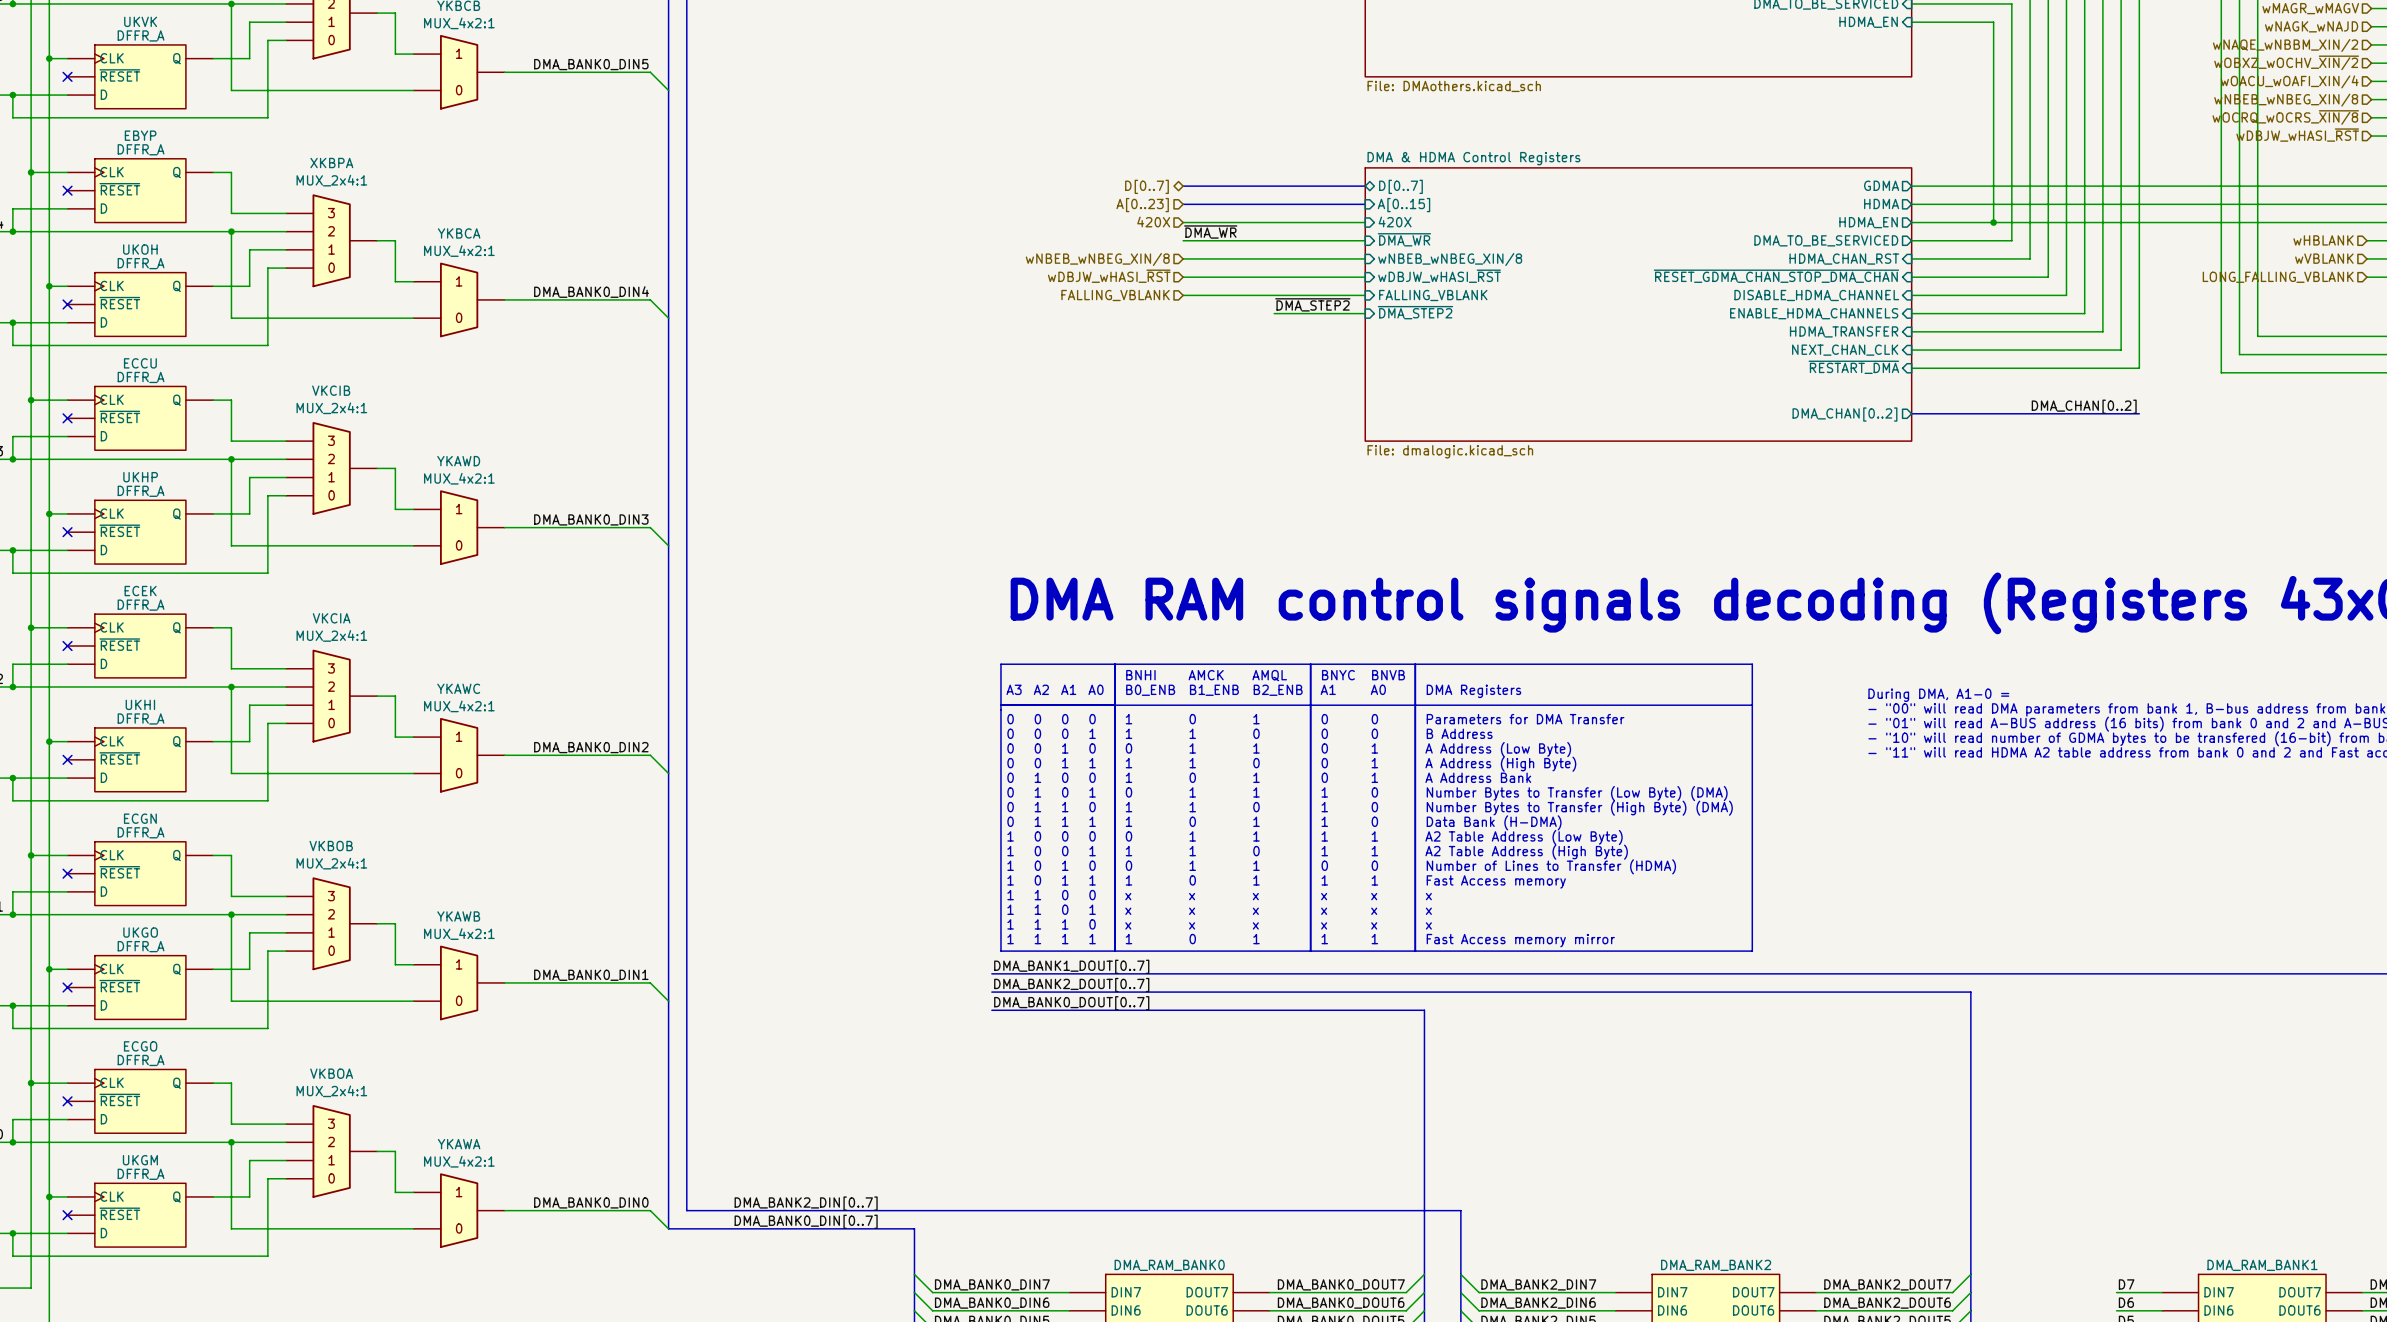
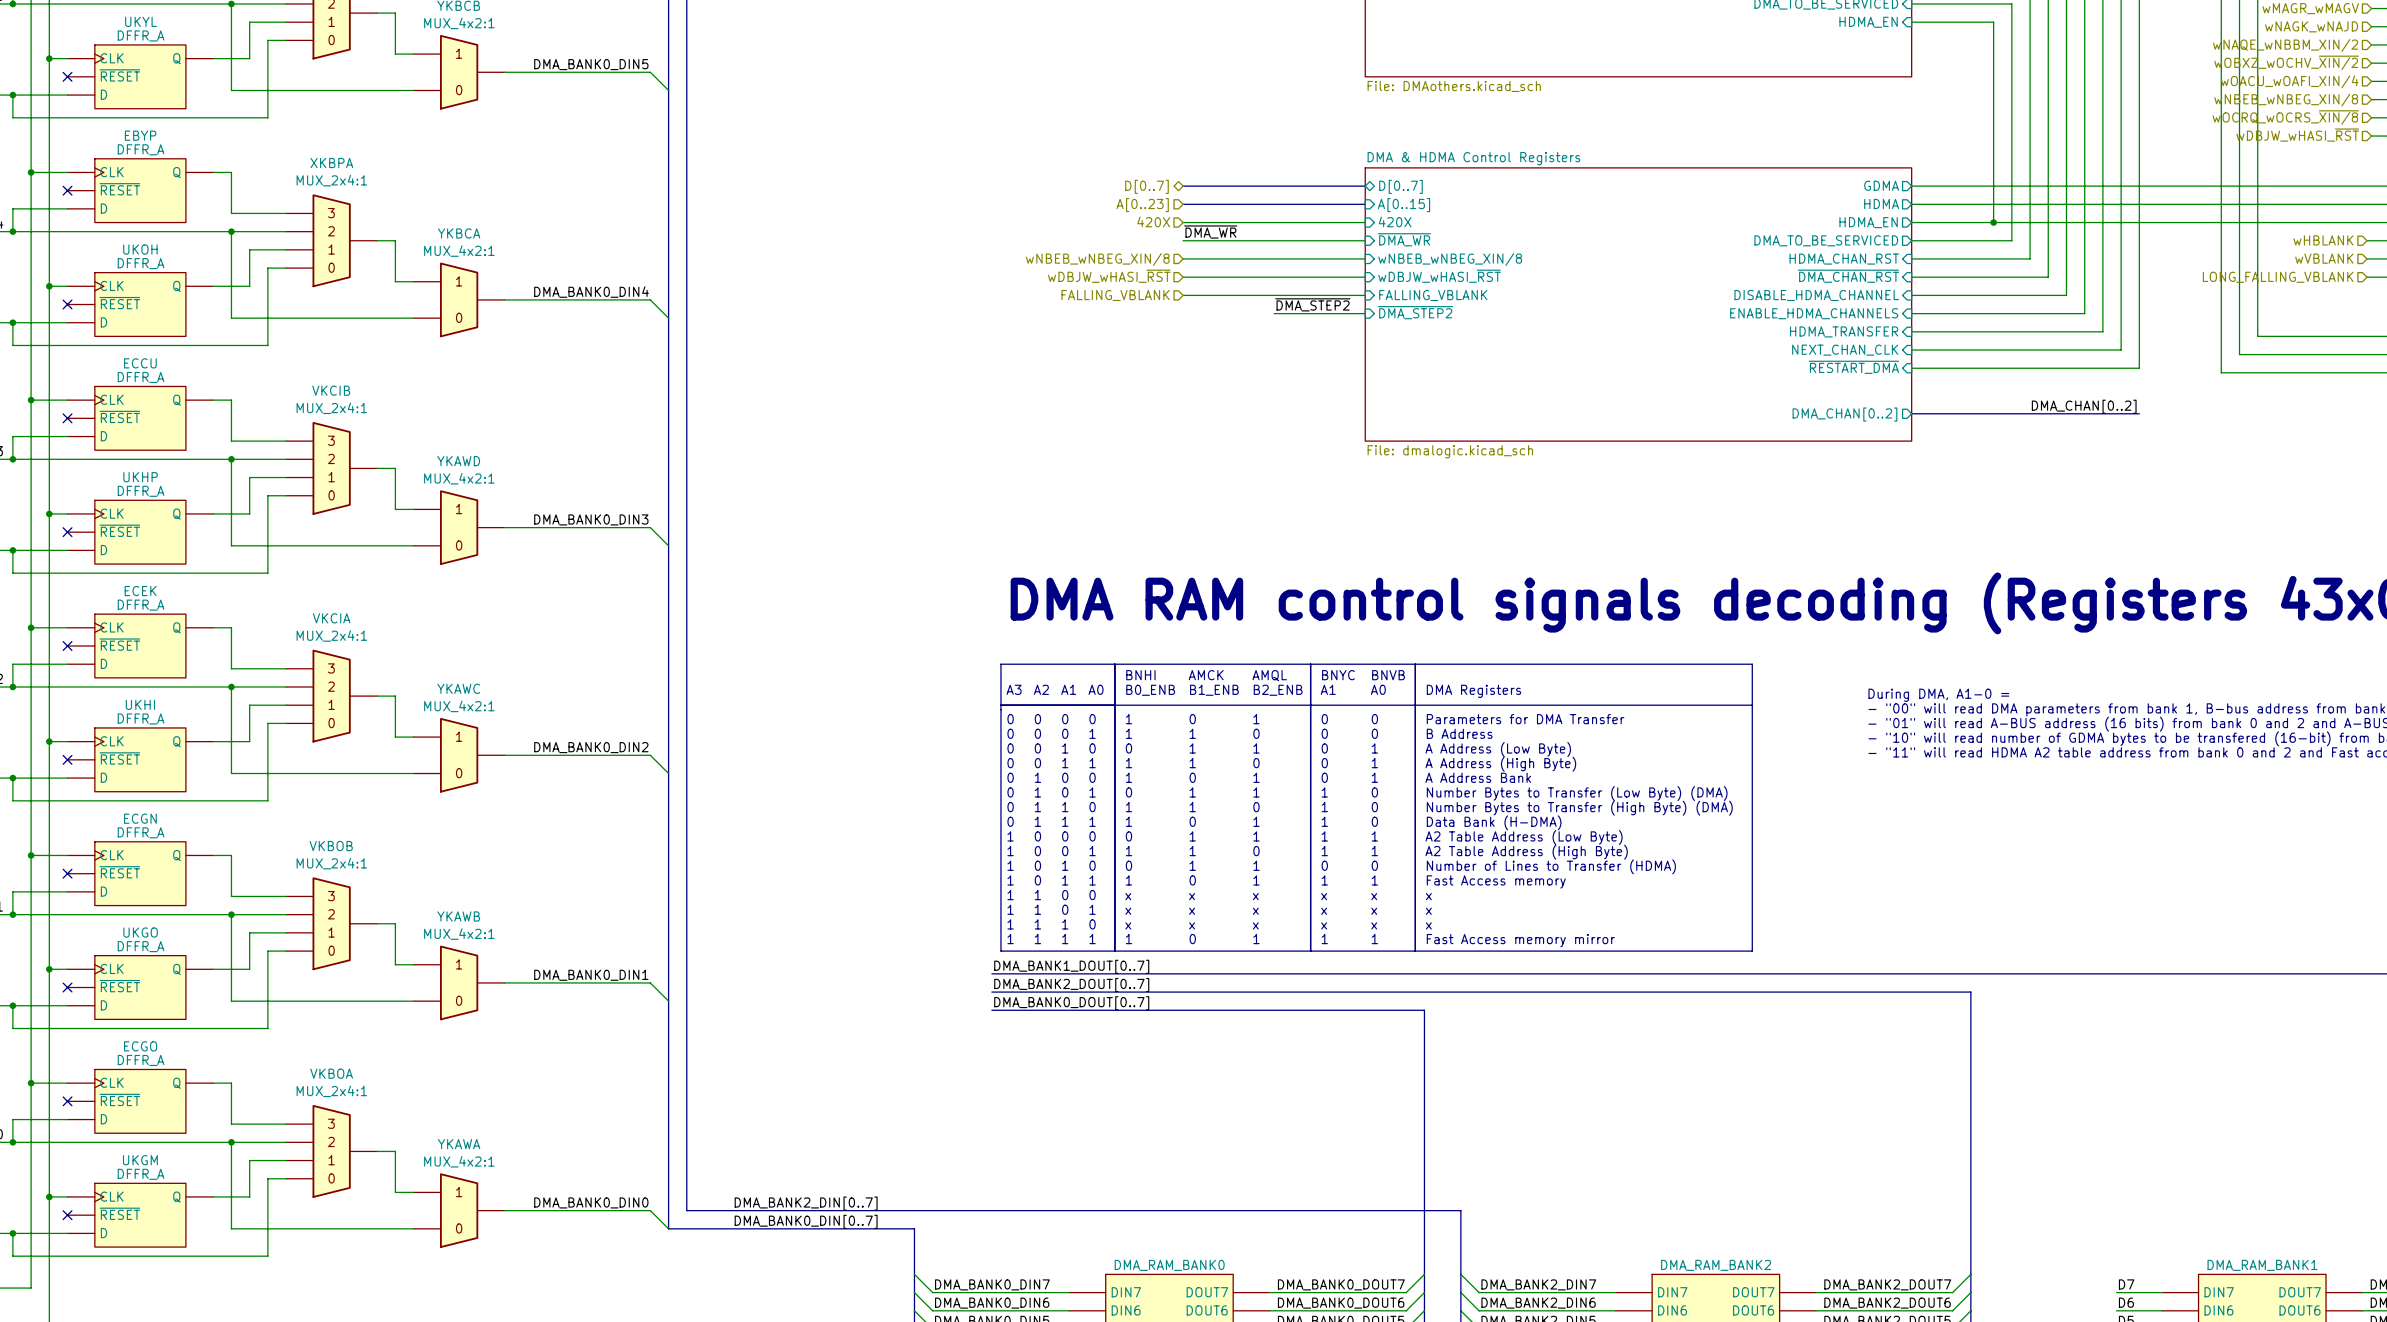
UKVK name: UKVK (140, 21) -> UKYL (141, 21)
sheet pin: ~{RESET_GDMA_CHAN_STOP_DMA_CHAN} (1776, 276) -> ~{DMA_CHAN_RST} (1848, 276)

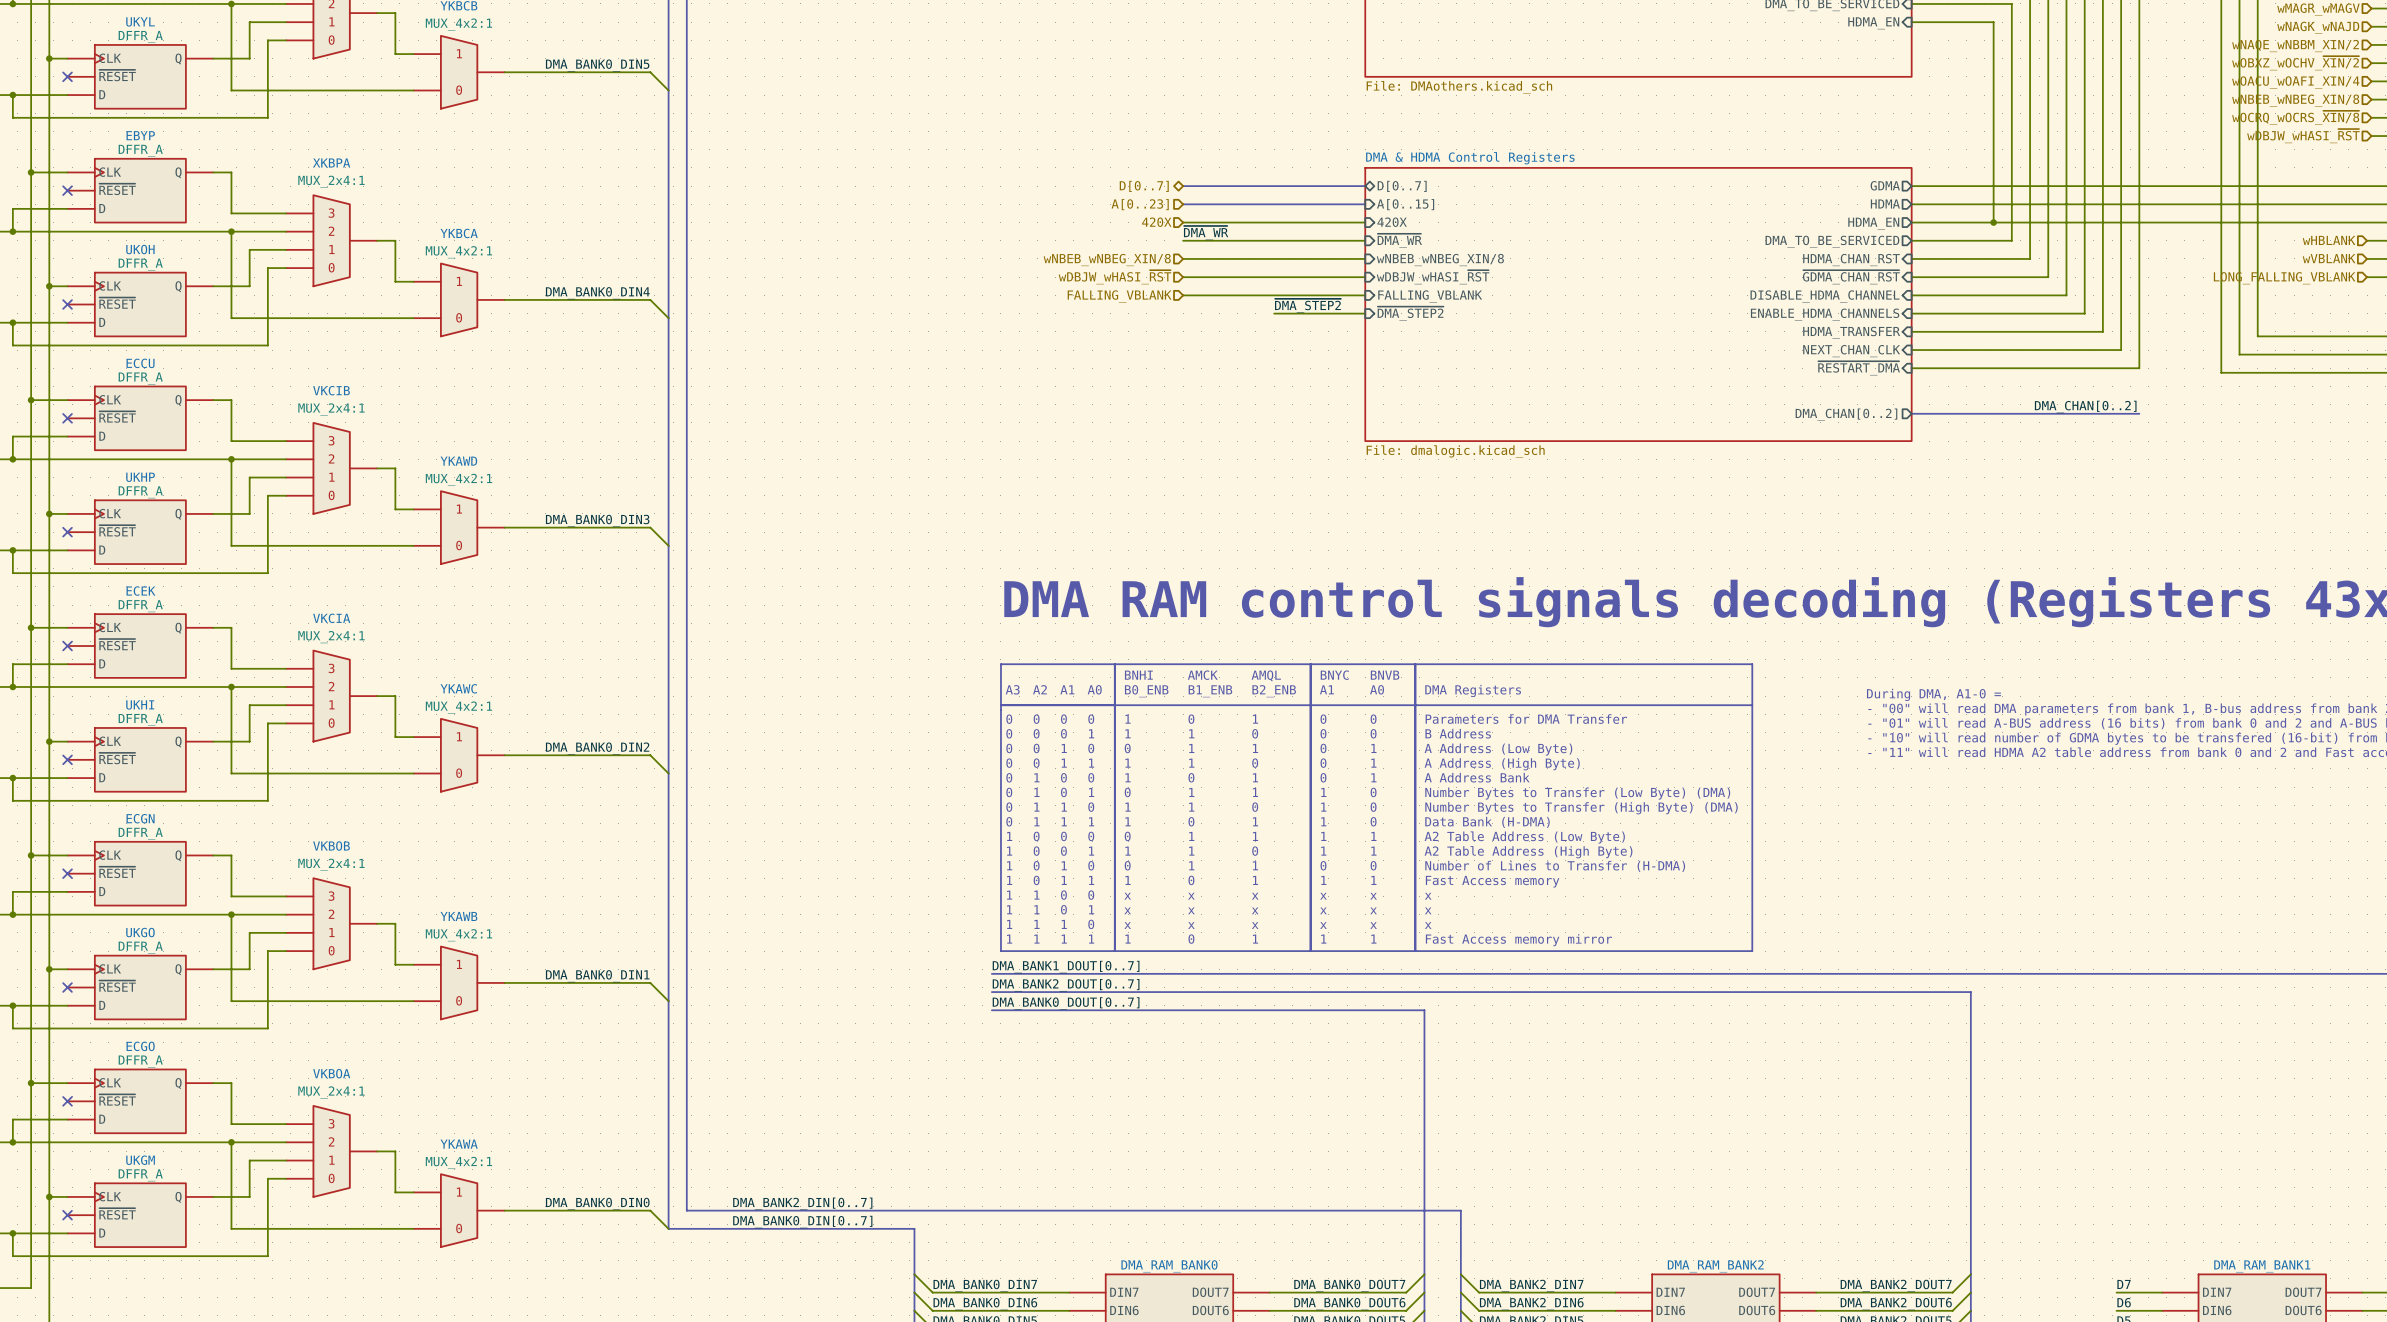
sheet pin: ~{DMA_CHAN_RST} (1848, 276) -> ~{GDMA_CHAN_RST} (1851, 277)
text: Number of Lines to Transfer (HDMA) (1551, 866) -> Number of Lines to Transfer (H-DMA) (1555, 866)

